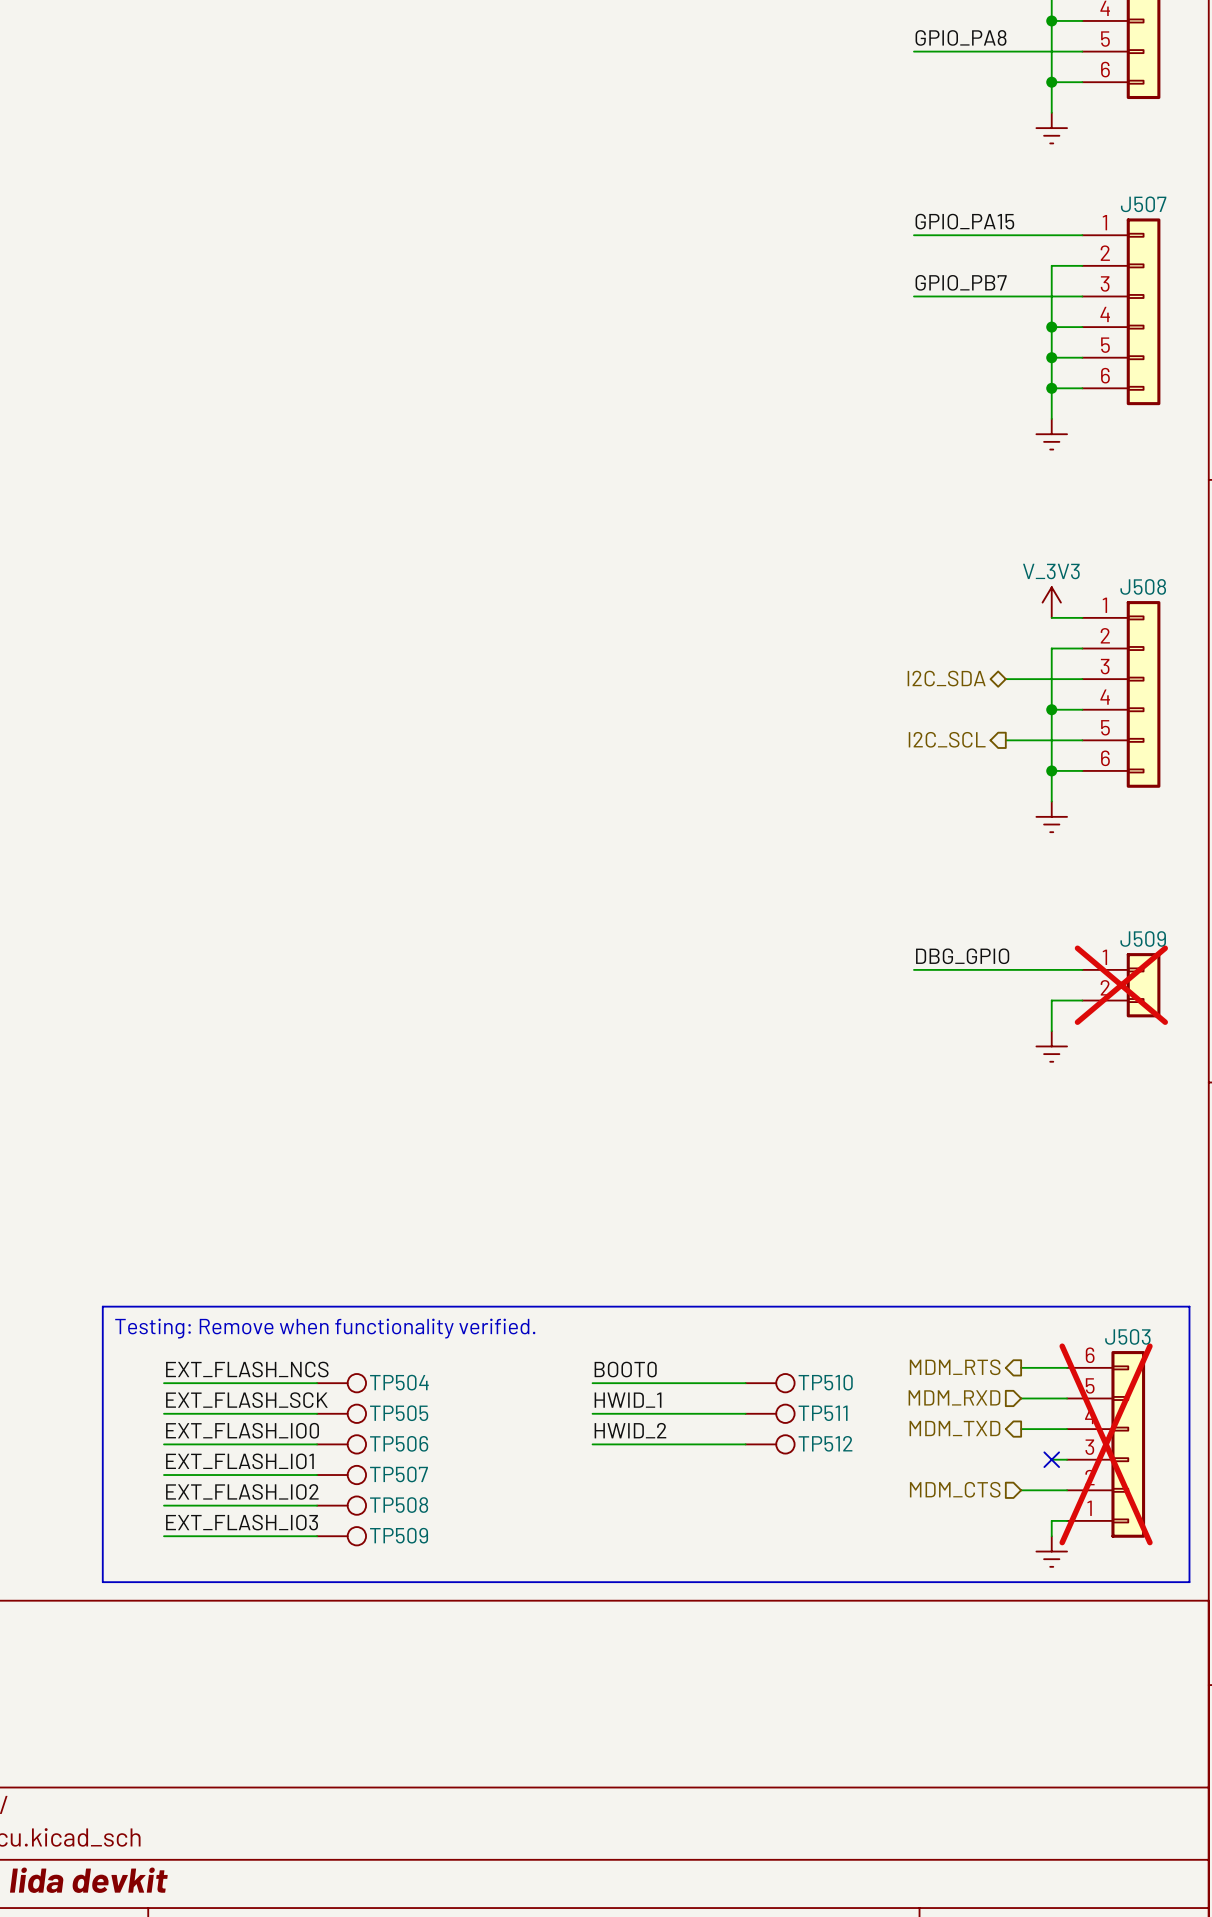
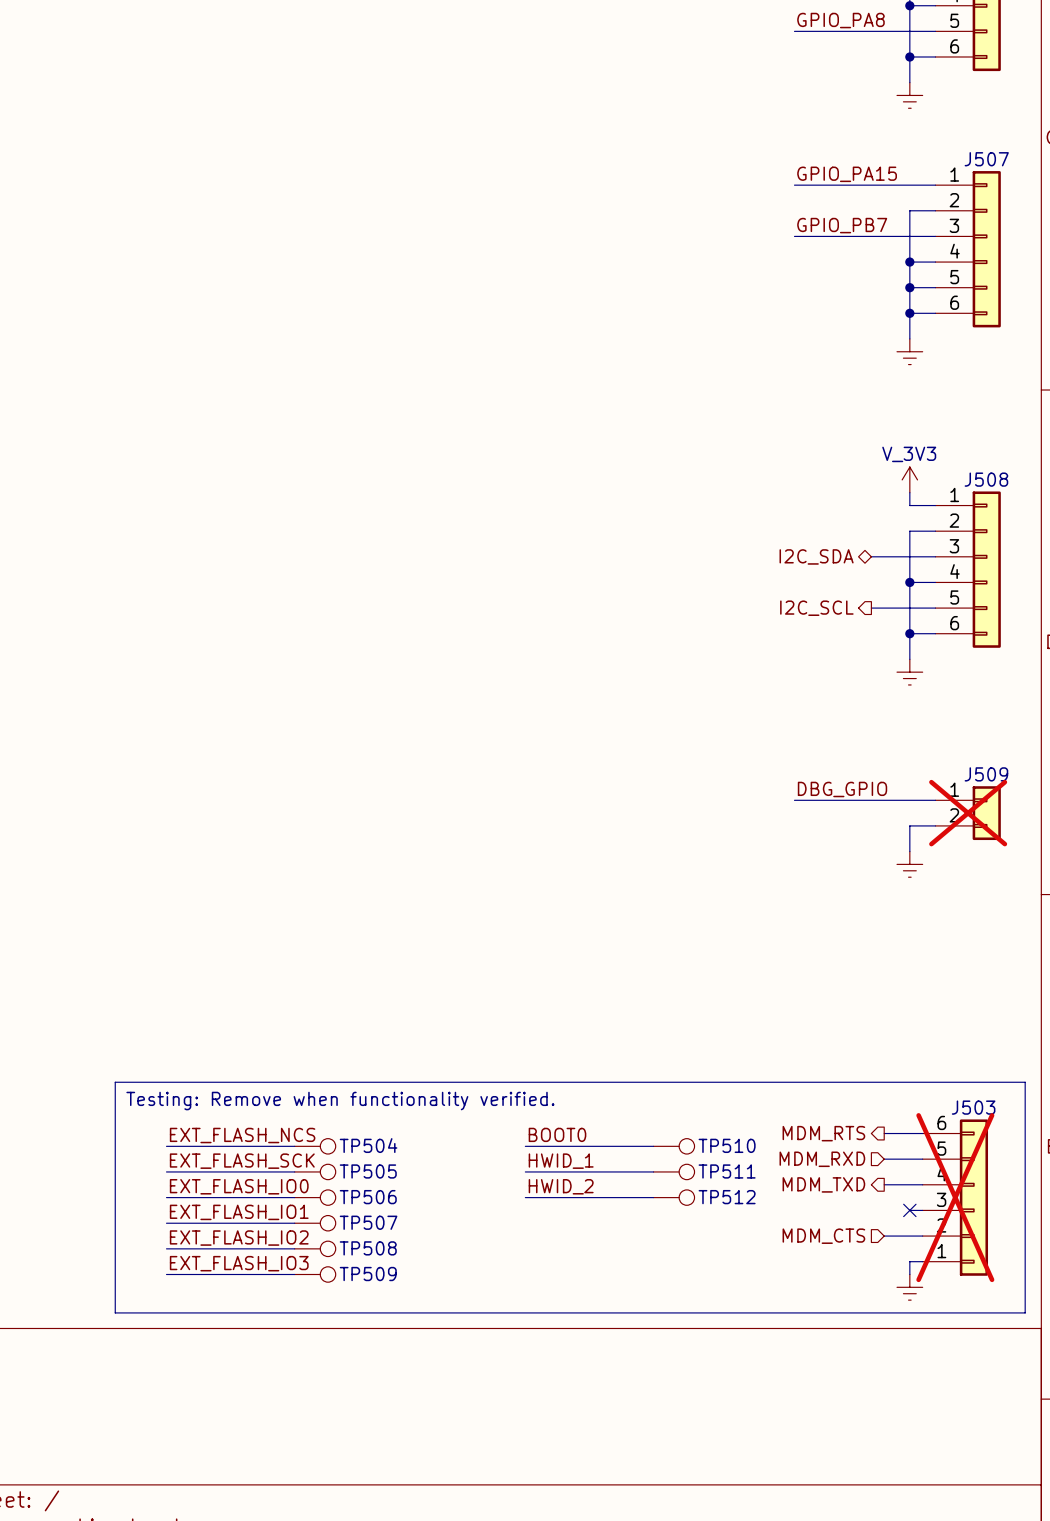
power symbol position: V_3V3 (1051, 602) -> V_3V3 (909, 479)

